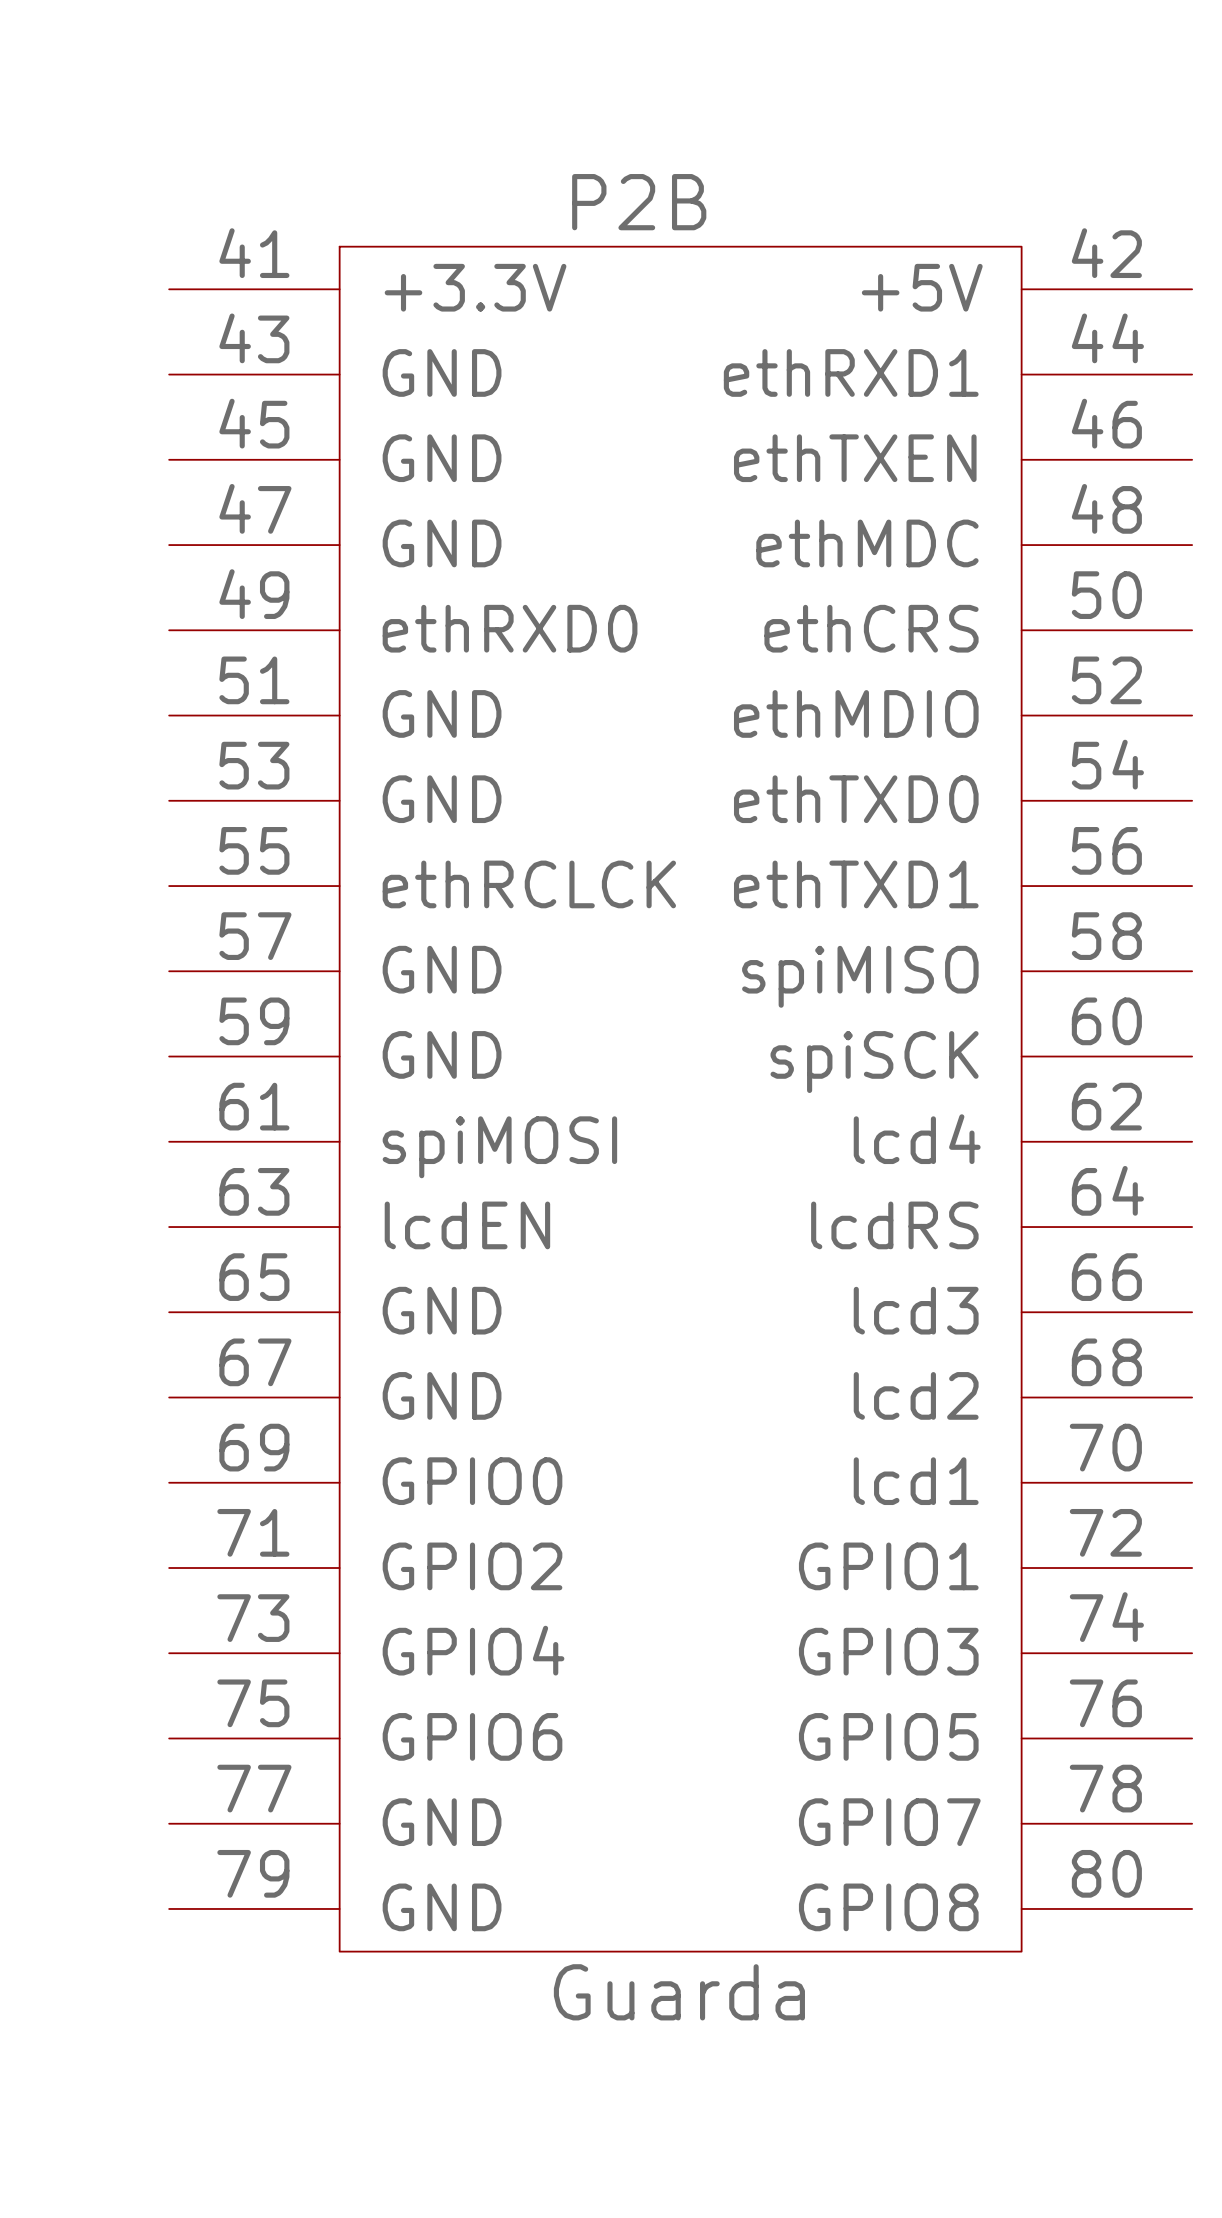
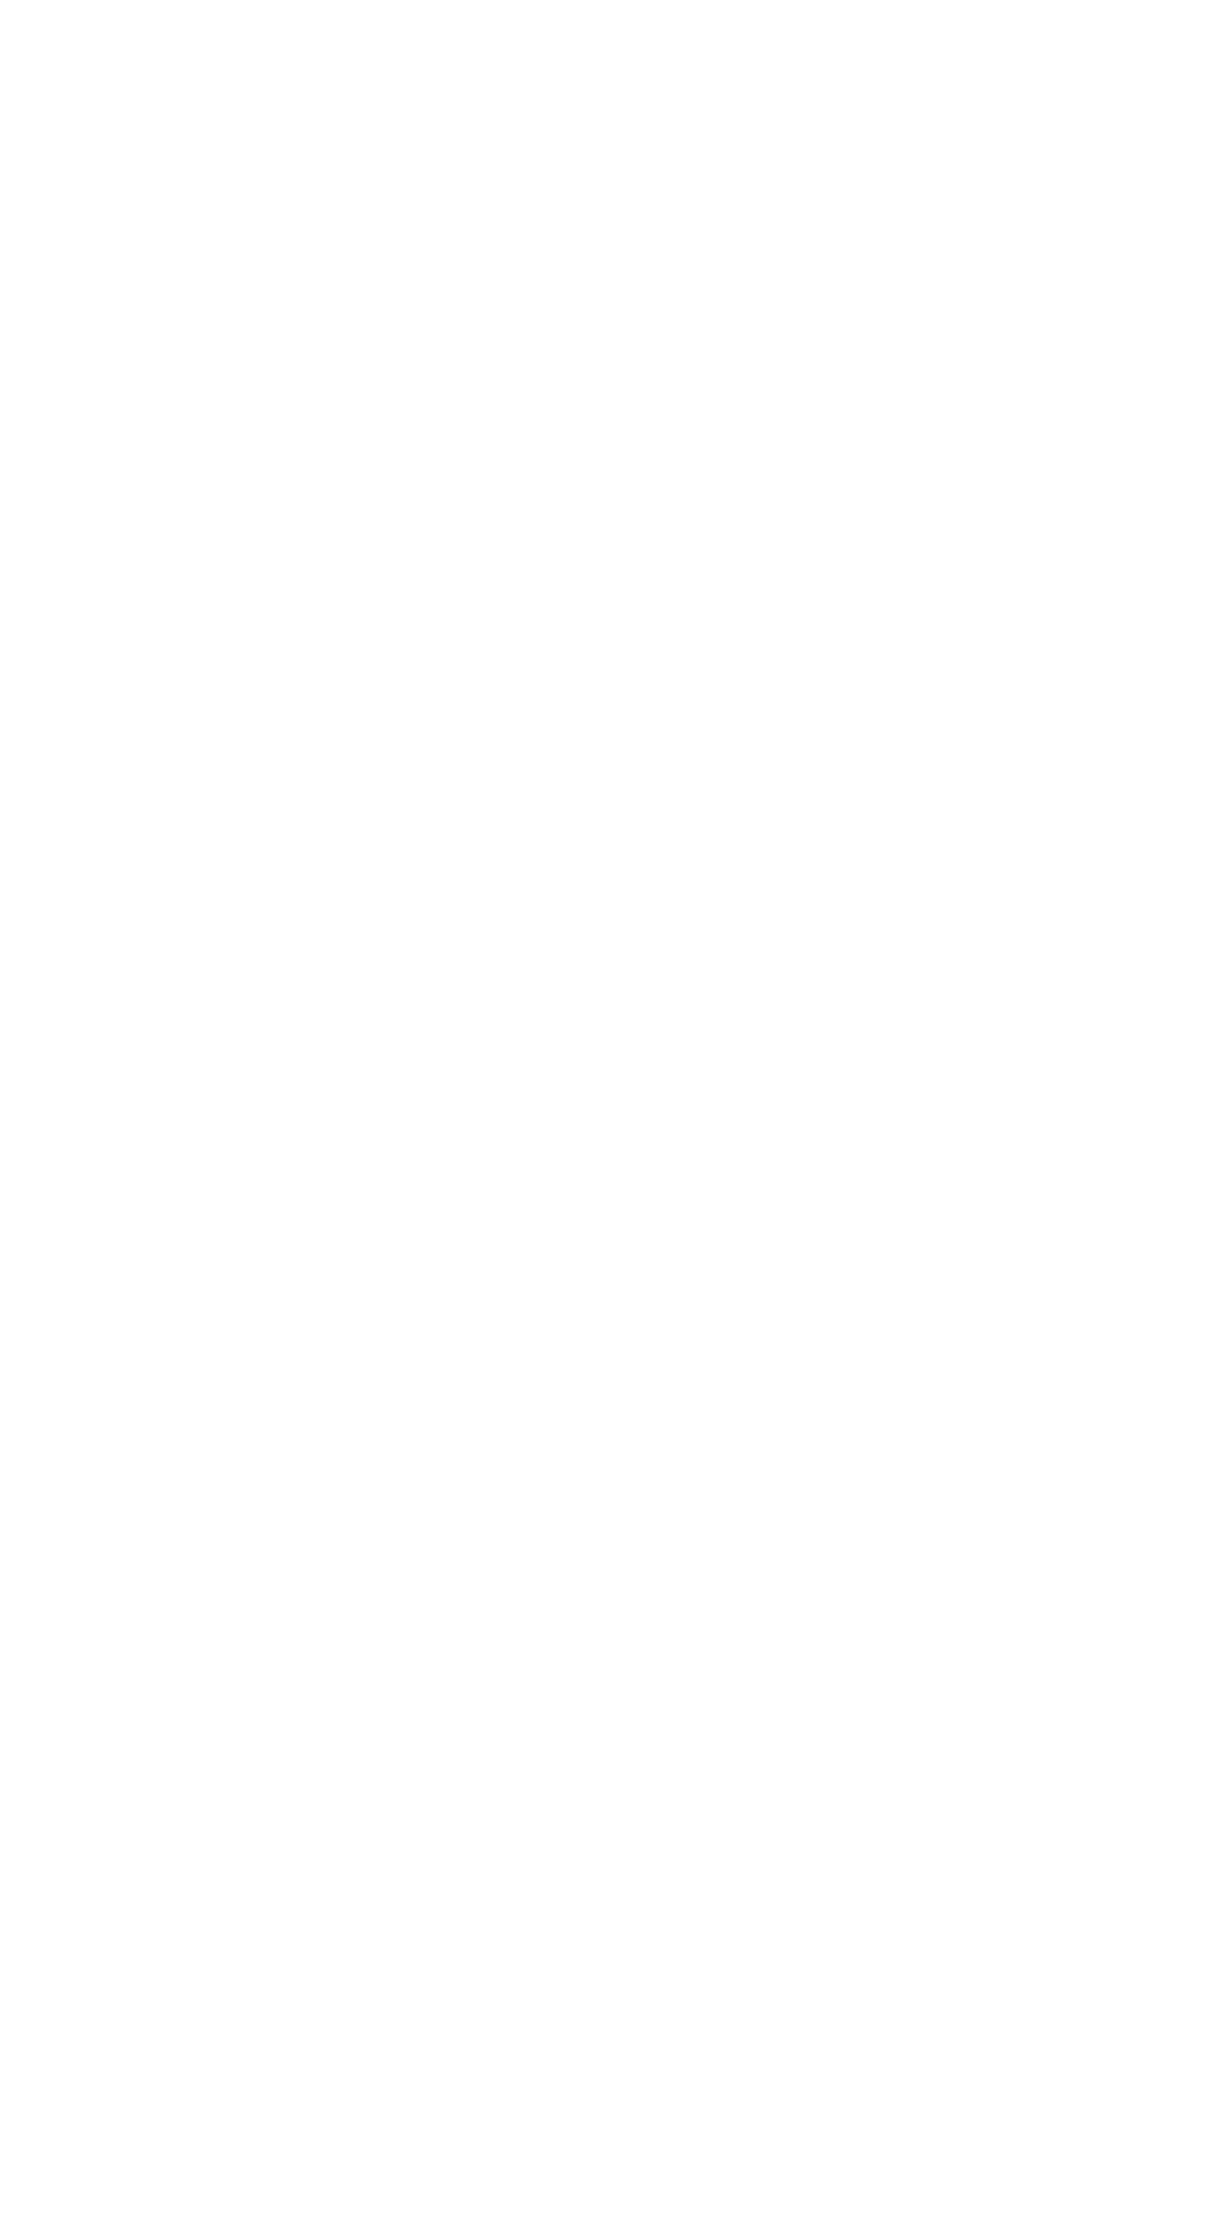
P2B: Guarda (680, 1099) -> none

